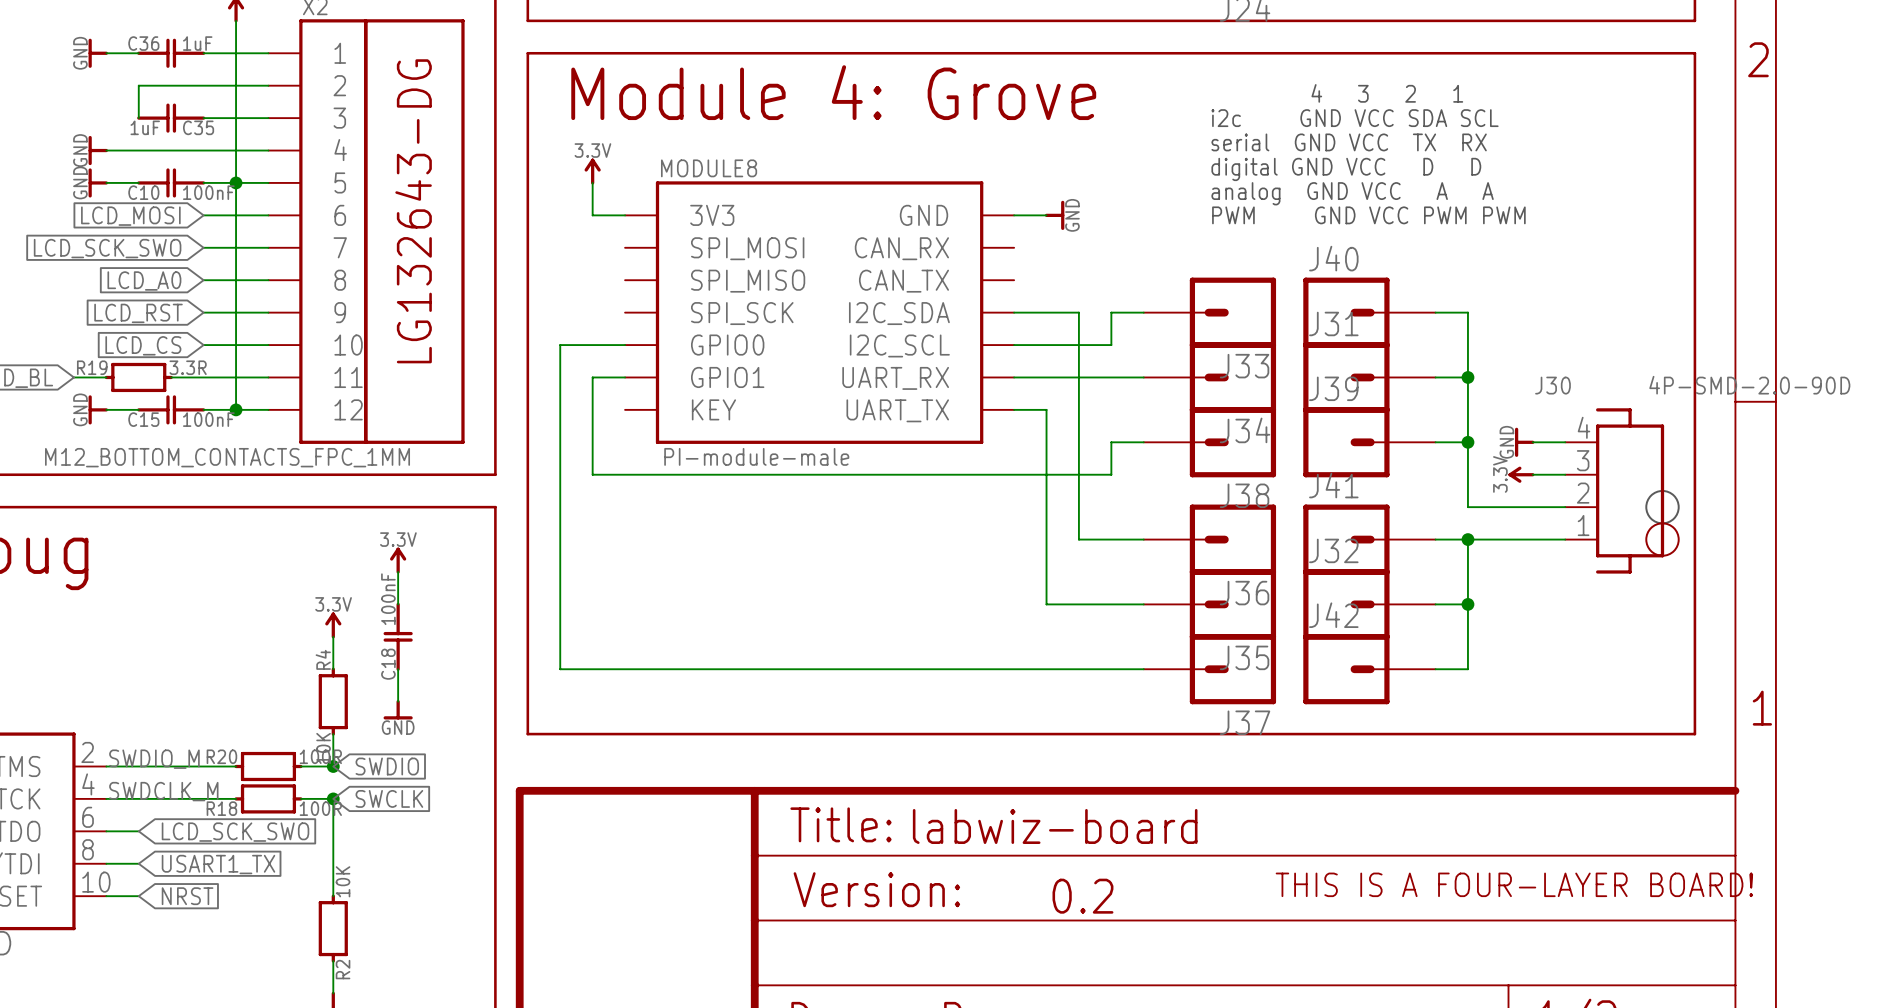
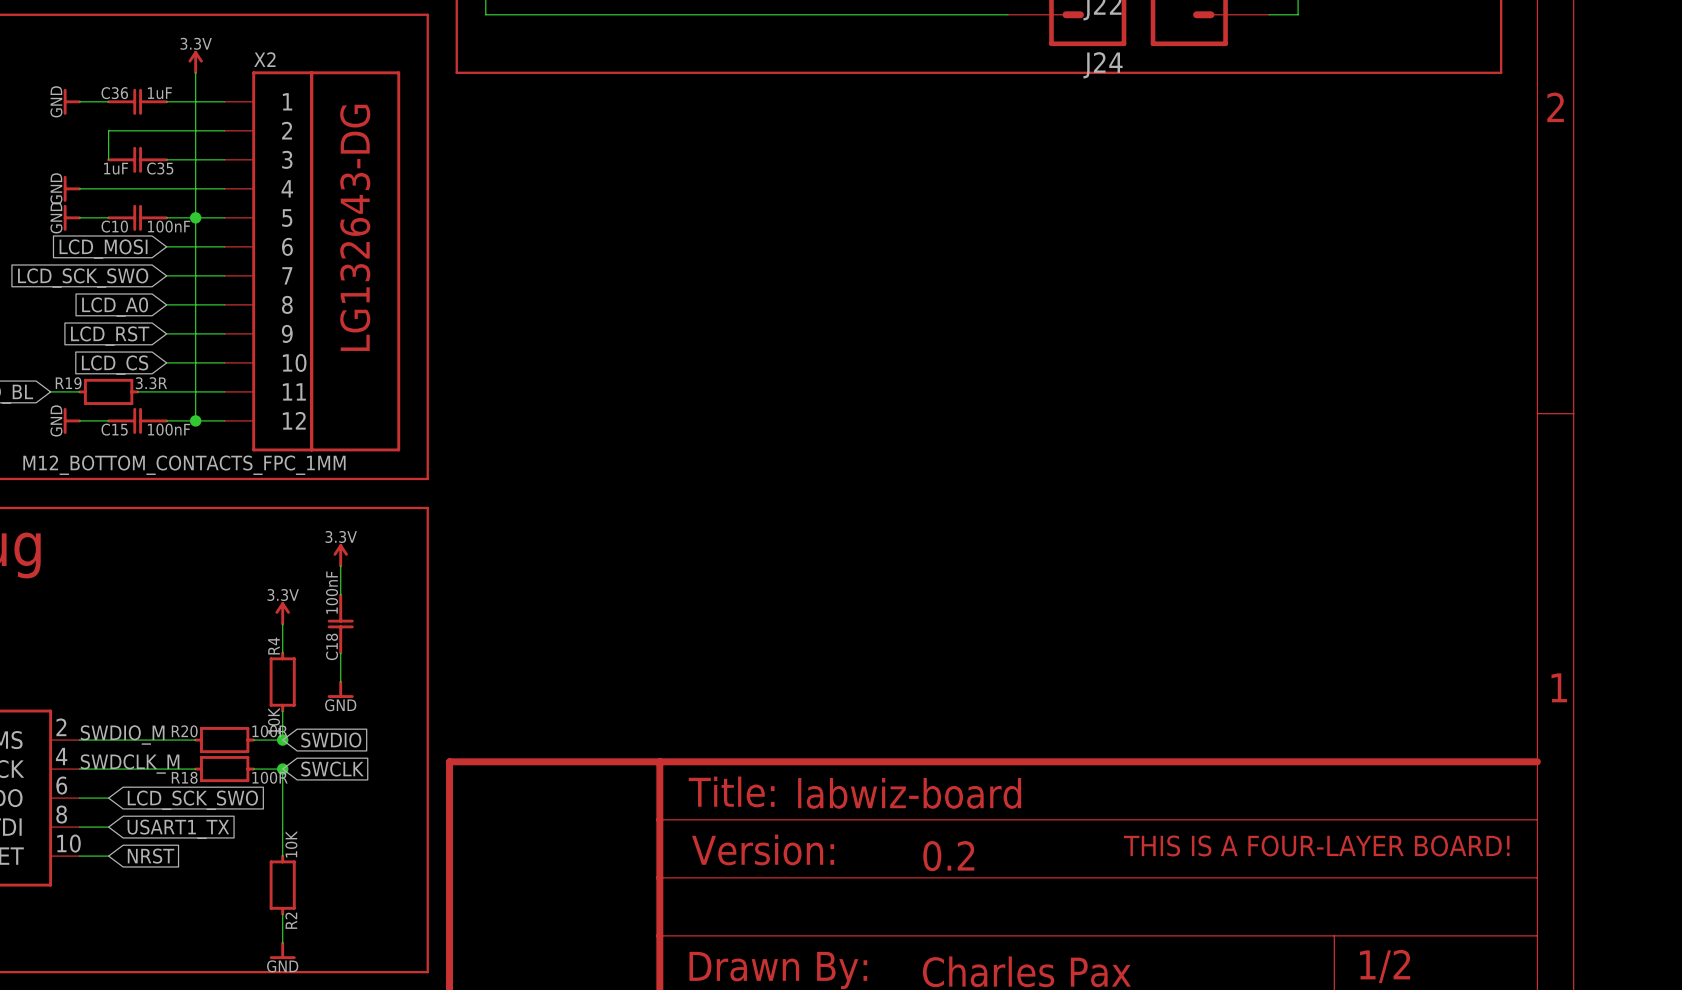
line: (527, 53) (527, 734) (1694, 734) (1694, 53) (527, 53) -> none
text: Module 4: Grove (833, 92) -> none
text: 4 3 2 1 (1387, 93) -> none
text: i2c GND VCC SDA SCL (1355, 118) -> none
text: serial GND VCC TX RX (1349, 142) -> none
text: digital GND VCC D D (1346, 169) -> none
power symbol: 3.3V (592, 171) -> none
wire: (592, 182) (592, 215) (625, 215) -> none
text: analog GND VCC A A (1352, 193) -> none
wire: (1014, 215) (1046, 215) -> none
power symbol: GND (1054, 215) -> none
text: PWM GND VCC PWM PWM (1368, 215) -> none
MODULE8: PI-module-male (819, 312) -> none
wire: (1014, 312) (1078, 312) (1078, 539) (1143, 539) -> none
wire: (1143, 312) (1111, 312) (1111, 345) (1014, 345) -> none
J33: (1209, 312) -> none
J40: (1369, 312) -> none
wire: (1435, 312) (1467, 312) (1467, 507) (1565, 507) -> none
wire: (625, 345) (560, 345) (560, 669) (1143, 669) -> none
wire: (625, 377) (592, 377) (592, 474) (1111, 474) (1111, 442) (1143, 442) -> none
wire: (1014, 377) (1143, 377) -> none
J34: (1209, 377) -> none
J31: (1369, 377) -> none
wire: (1435, 377) (1467, 377) -> none
junction: (1467, 377) -> none
wire: (1014, 409) (1046, 409) (1046, 604) (1143, 604) -> none
J38: (1209, 442) -> none
J39: (1369, 442) -> none
wire: (1435, 442) (1467, 442) -> none
junction: (1467, 442) -> none
power symbol: GND (1524, 442) -> none
wire: (1532, 442) (1565, 442) -> none
power symbol: 3.3V (1521, 474) -> none
wire: (1532, 474) (1565, 474) -> none
drawing: [1645, 489, 1680, 557] -> none
J30: 4P-SMD-2.0-90D (1614, 490) -> none
J36: (1209, 539) -> none
J41: (1369, 539) -> none
wire: (1435, 539) (1565, 539) -> none
wire: (1467, 539) (1467, 669) (1435, 669) -> none
junction: (1467, 539) -> none
J35: (1209, 604) -> none
J32: (1369, 604) -> none
wire: (1435, 604) (1467, 604) -> none
junction: (1467, 604) -> none
J37: (1209, 669) -> none
J42: (1369, 669) -> none

